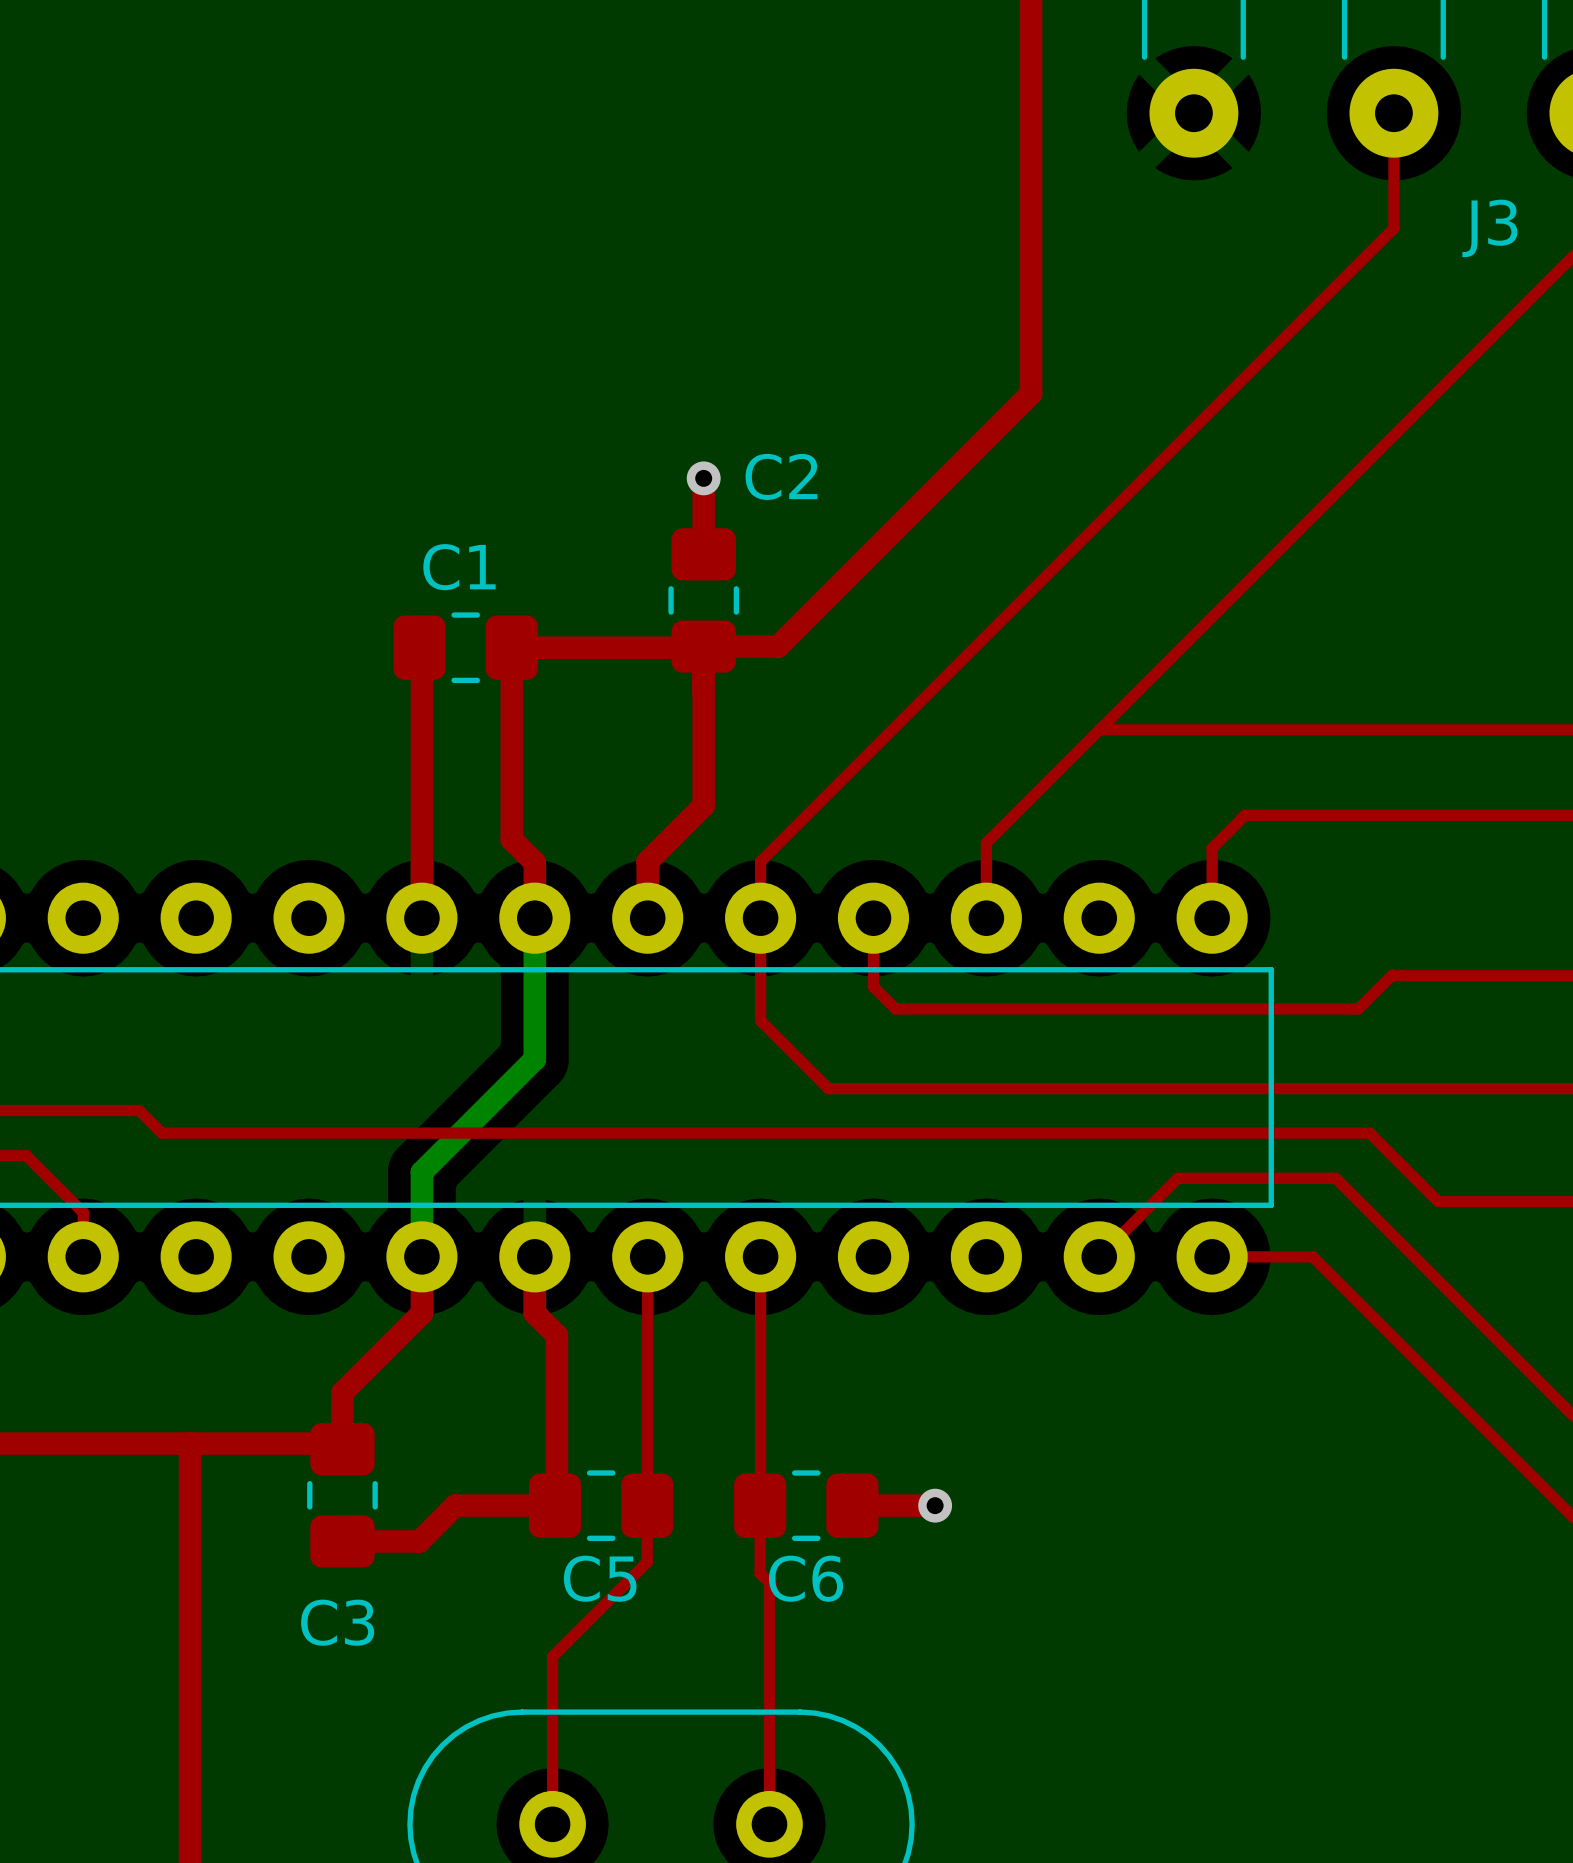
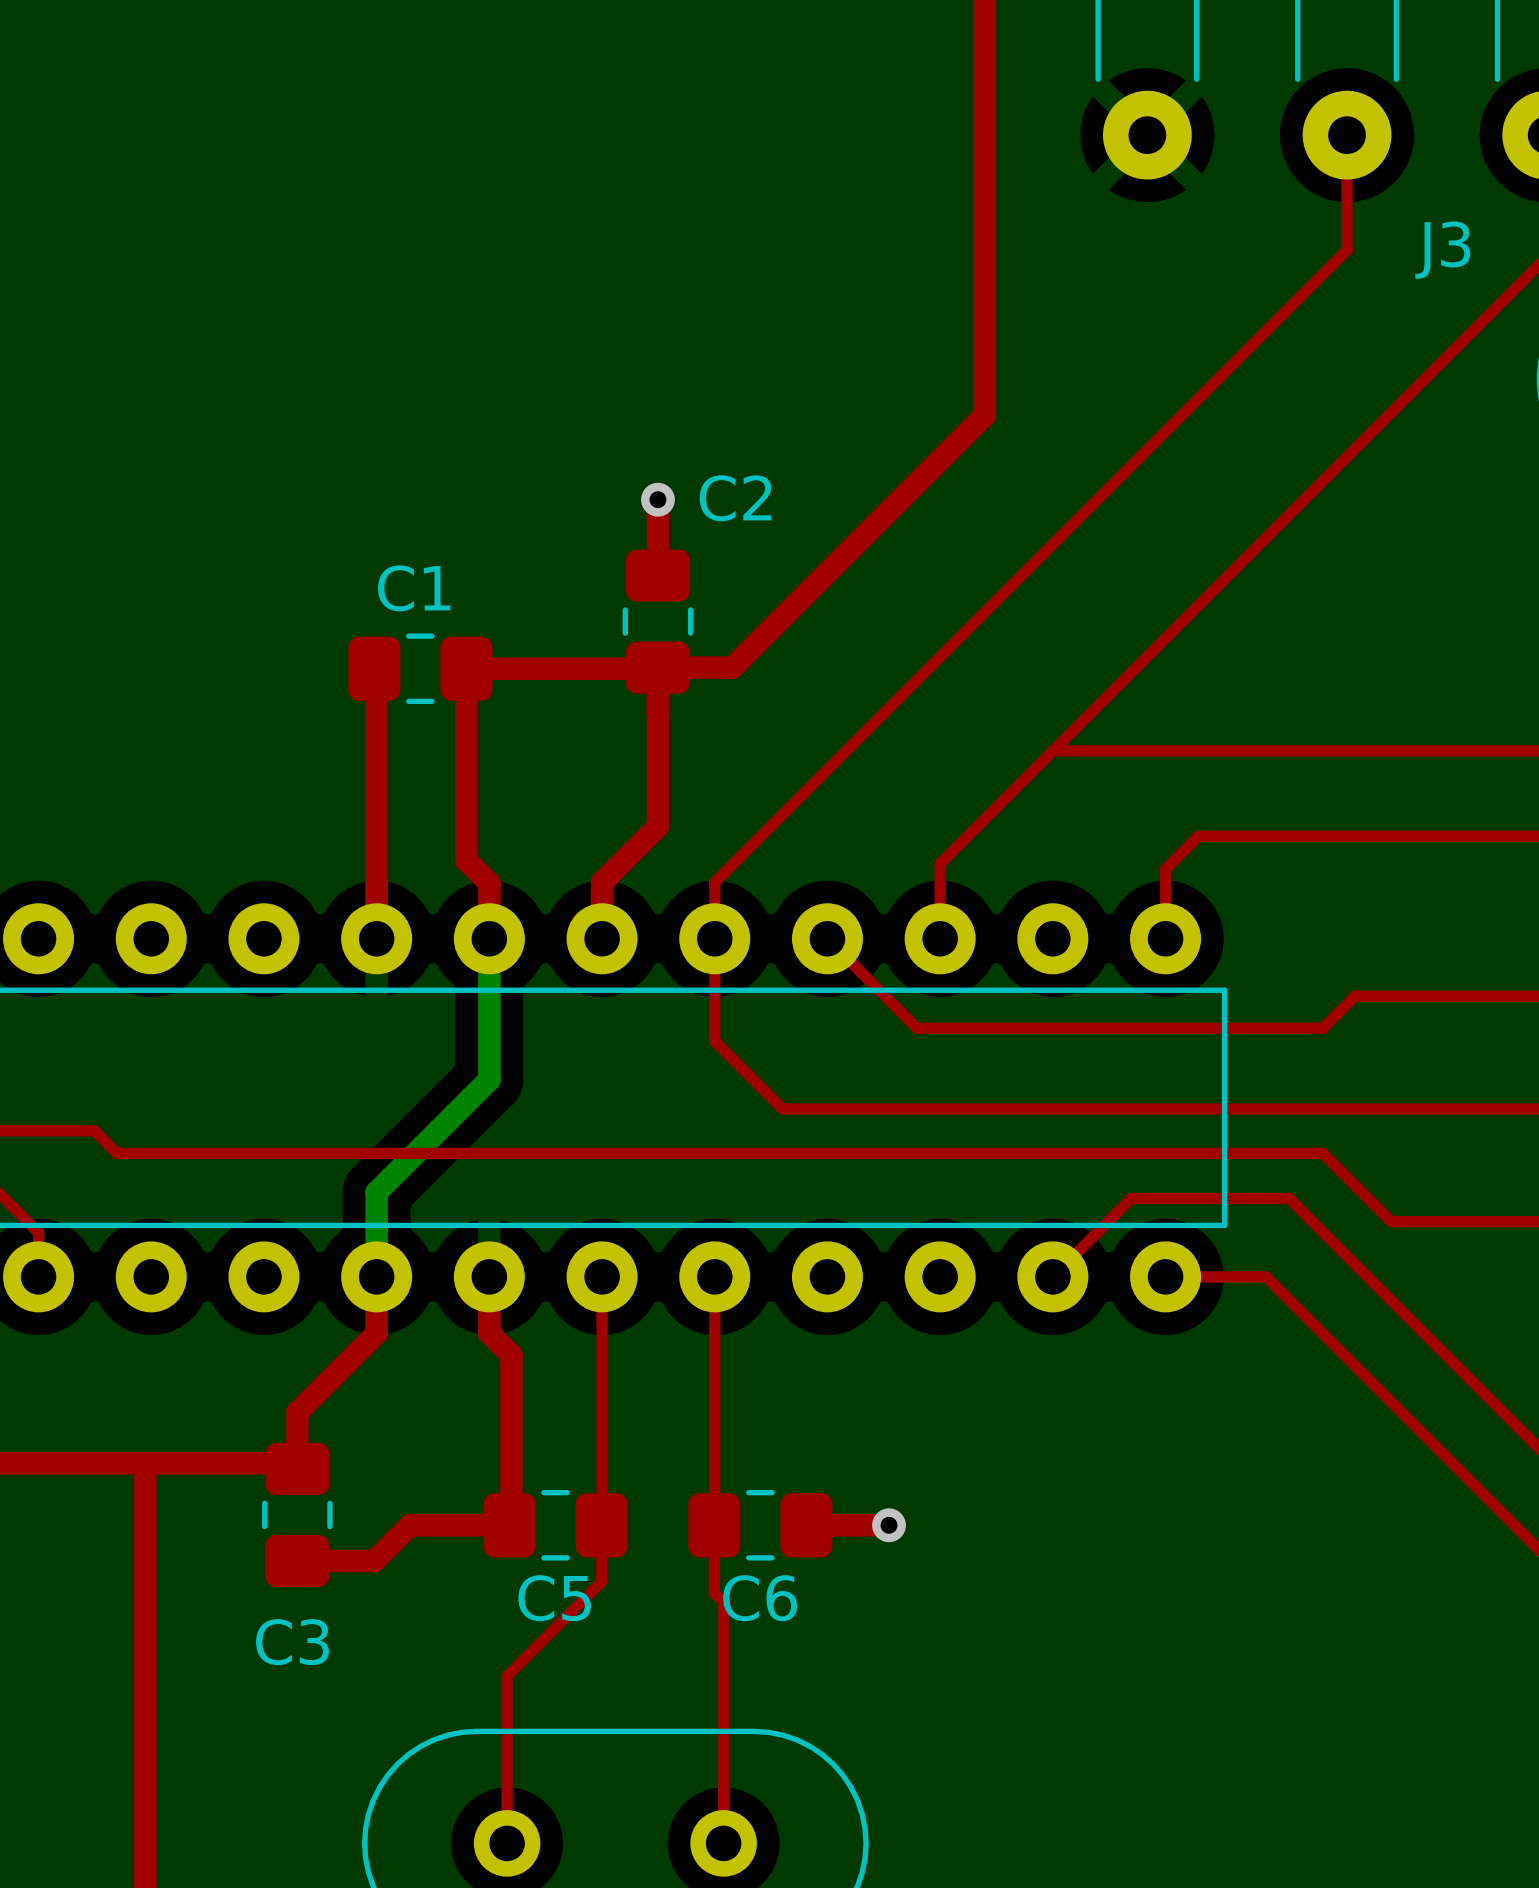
top track: (873, 918) (873, 986) (895, 1008) (1358, 1008) (1392, 975) (1401, 975) -> (827, 938) (916, 1028) (1322, 1028) (1354, 996)

